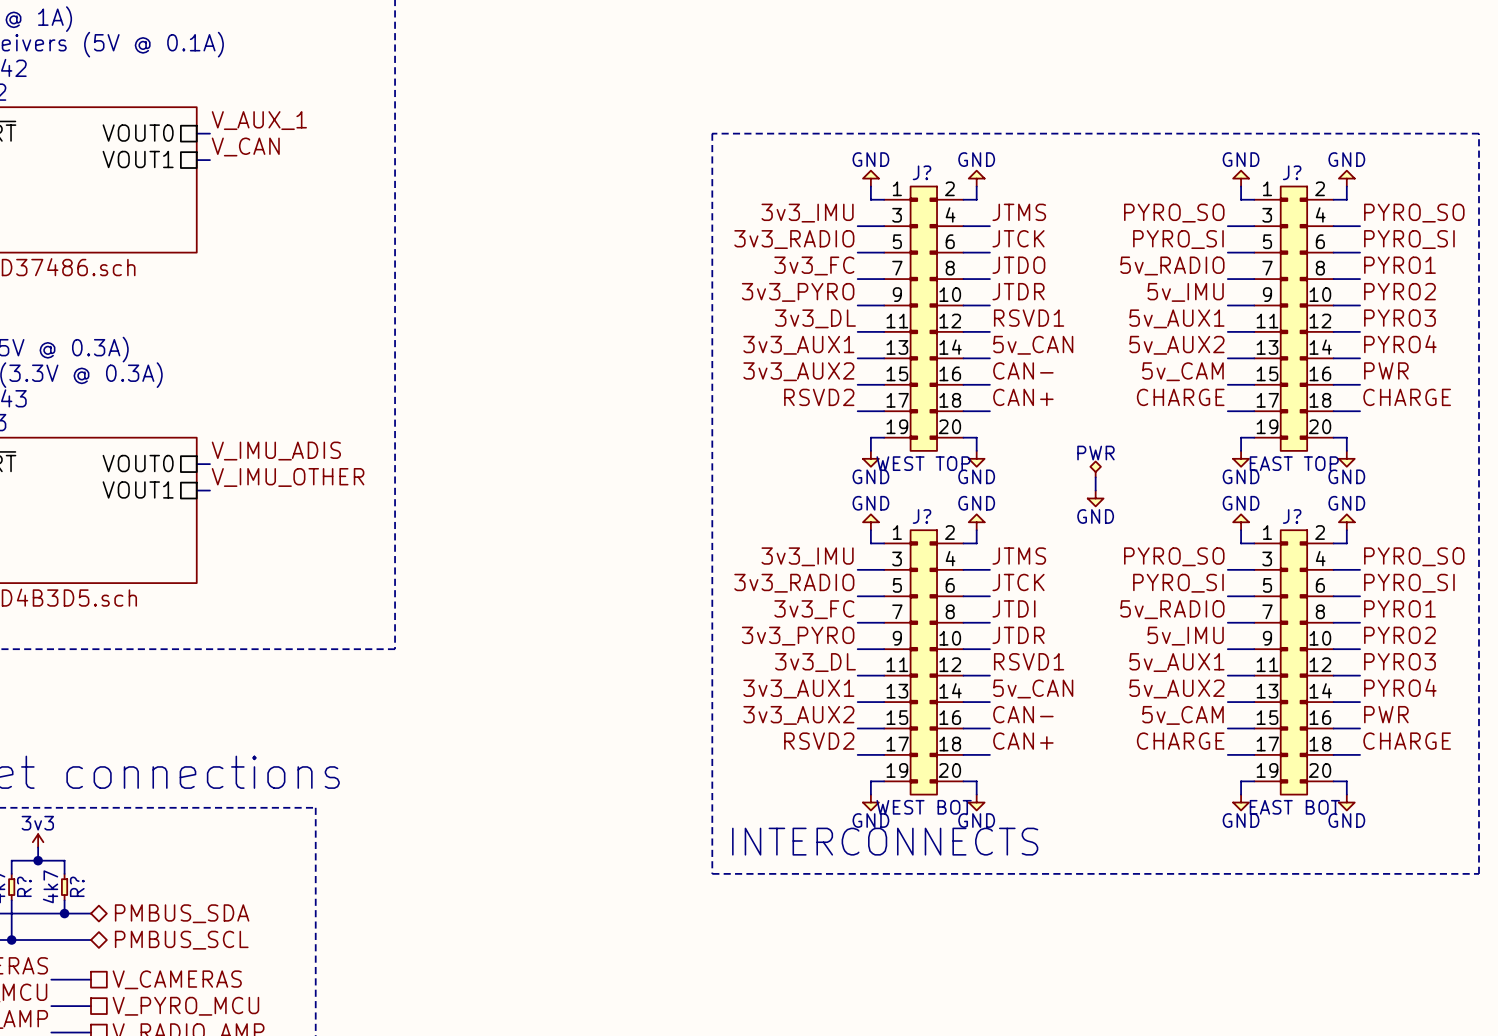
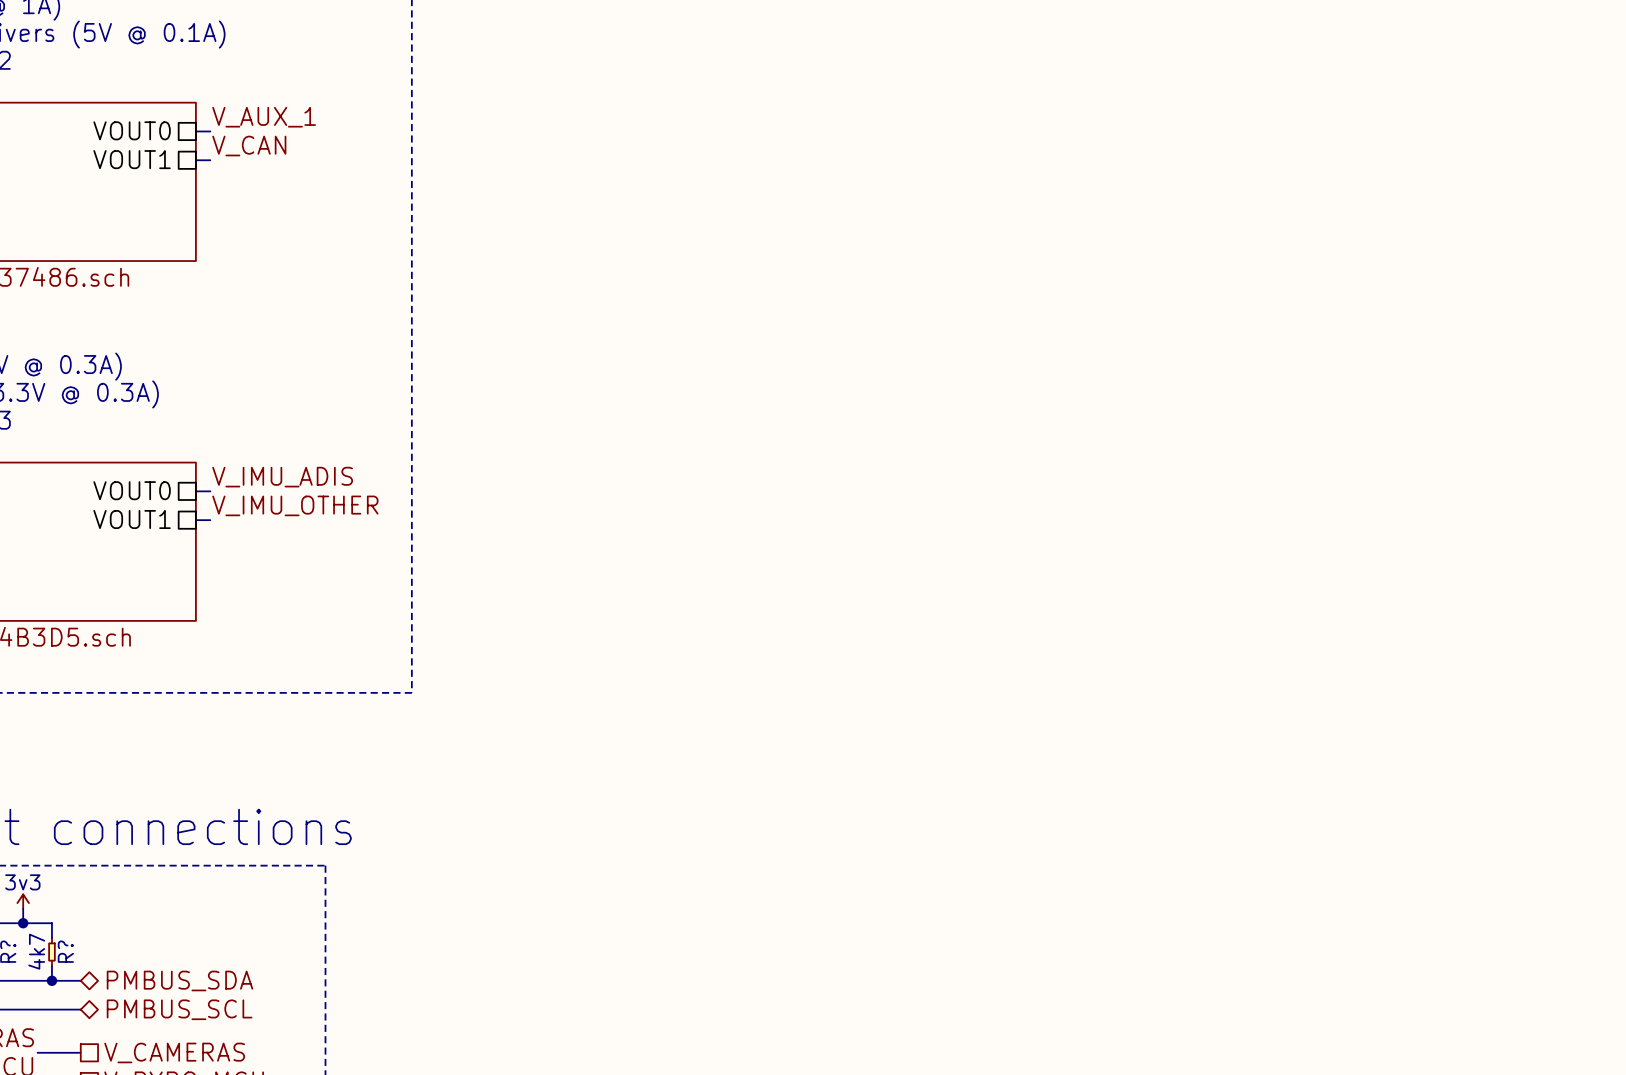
line: (712, 133) (1479, 133) (1479, 873) (712, 873) (712, 133) -> none
power symbol: GND (870, 178) -> none
power symbol: GND (976, 178) -> none
power symbol: GND (1241, 178) -> none
power symbol: GND (1346, 178) -> none
wire: (870, 186) (870, 199) (884, 199) -> none
wire: (976, 186) (976, 199) (963, 199) -> none
wire: (1241, 186) (1241, 199) (1254, 199) -> none
wire: (1346, 186) (1346, 199) (1333, 199) -> none
label: JTMS (1019, 212) -> none
label: 3v3_IMU (807, 213) -> none
label: PYRO_SO (1174, 213) -> none
label: PYRO_SO (1414, 213) -> none
wire: (857, 226) (884, 226) -> none
wire: (963, 226) (989, 226) -> none
wire: (1227, 226) (1254, 226) -> none
wire: (1333, 226) (1360, 226) -> none
label: JTCK (1018, 238) -> none
label: 3v3_RADIO (794, 239) -> none
label: PYRO_SI (1178, 239) -> none
label: PYRO_SI (1409, 239) -> none
wire: (857, 252) (884, 252) -> none
wire: (963, 252) (989, 252) -> none
wire: (1227, 252) (1254, 252) -> none
wire: (1333, 252) (1360, 252) -> none
label: 3v3_FC (814, 265) -> none
label: JTDO (1018, 265) -> none
label: 5v_RADIO (1172, 265) -> none
label: PYRO1 (1399, 265) -> none
wire: (857, 279) (884, 279) -> none
wire: (963, 279) (989, 279) -> none
wire: (1227, 279) (1254, 279) -> none
wire: (1333, 279) (1360, 279) -> none
label: JTDR (1018, 291) -> none
label: PYRO2 (1399, 291) -> none
label: 3v3_PYRO (798, 292) -> none
label: 5v_IMU (1185, 292) -> none
wire: (857, 305) (884, 305) -> none
wire: (963, 305) (989, 305) -> none
wire: (1227, 305) (1254, 305) -> none
wire: (1333, 305) (1360, 305) -> none
label: 3v3_DL (815, 318) -> none
J?: WEST TOP (923, 318) -> none
label: RSVD1 (1029, 318) -> none
label: 5v_AUX1 (1176, 318) -> none
J?: EAST TOP (1293, 318) -> none
label: PYRO3 (1399, 318) -> none
wire: (857, 331) (884, 331) -> none
wire: (963, 331) (989, 331) -> none
wire: (1227, 331) (1254, 331) -> none
wire: (1333, 331) (1360, 331) -> none
label: PYRO4 (1400, 344) -> none
label: 3v3_AUX1 (798, 345) -> none
label: 5v_CAN (1033, 345) -> none
label: 5v_AUX2 (1176, 345) -> none
wire: (857, 358) (884, 358) -> none
wire: (963, 358) (989, 358) -> none
wire: (1227, 358) (1254, 358) -> none
wire: (1333, 358) (1360, 358) -> none
label: CAN- (1023, 370) -> none
label: PWR (1386, 370) -> none
label: 3v3_AUX2 (798, 371) -> none
label: 5v_CAM (1182, 371) -> none
wire: (857, 384) (884, 384) -> none
wire: (963, 384) (989, 384) -> none
wire: (1227, 384) (1254, 384) -> none
wire: (1333, 384) (1360, 384) -> none
label: RSVD2 (819, 397) -> none
label: CAN+ (1023, 397) -> none
label: CHARGE (1180, 397) -> none
label: CHARGE (1407, 397) -> none
wire: (857, 411) (884, 411) -> none
wire: (963, 411) (989, 411) -> none
wire: (1227, 411) (1254, 411) -> none
wire: (1333, 411) (1360, 411) -> none
wire: (884, 437) (870, 437) (870, 450) -> none
wire: (963, 437) (976, 437) (976, 450) -> none
wire: (1254, 437) (1241, 437) (1241, 450) -> none
wire: (1333, 437) (1346, 437) (1346, 450) -> none
power symbol: GND (870, 458) -> none
power symbol: GND (976, 458) -> none
power symbol: GND (1241, 458) -> none
power symbol: GND (1346, 458) -> none
power symbol: PWR (1095, 469) -> none
wire: (1095, 477) (1095, 490) -> none
power symbol: GND (1095, 498) -> none
power symbol: GND (870, 522) -> none
power symbol: GND (976, 522) -> none
power symbol: GND (1241, 522) -> none
power symbol: GND (1346, 522) -> none
wire: (870, 530) (870, 543) (884, 543) -> none
wire: (976, 530) (976, 543) (963, 543) -> none
wire: (1241, 530) (1241, 543) (1254, 543) -> none
wire: (1346, 530) (1346, 543) (1333, 543) -> none
label: 3v3_IMU (807, 556) -> none
label: JTMS (1019, 556) -> none
label: PYRO_SO (1174, 556) -> none
label: PYRO_SO (1414, 556) -> none
wire: (857, 569) (884, 569) -> none
wire: (963, 569) (989, 569) -> none
wire: (1227, 569) (1254, 569) -> none
wire: (1333, 569) (1360, 569) -> none
label: JTCK (1018, 582) -> none
label: 3v3_RADIO (794, 583) -> none
label: PYRO_SI (1178, 583) -> none
label: PYRO_SI (1409, 583) -> none
wire: (857, 596) (884, 596) -> none
wire: (963, 596) (989, 596) -> none
wire: (1227, 596) (1254, 596) -> none
wire: (1333, 596) (1360, 596) -> none
label: JTDI (1013, 608) -> none
label: PYRO1 (1399, 608) -> none
label: 3v3_FC (814, 609) -> none
label: 5v_RADIO (1172, 609) -> none
wire: (857, 622) (884, 622) -> none
wire: (963, 622) (989, 622) -> none
wire: (1227, 622) (1254, 622) -> none
wire: (1333, 622) (1360, 622) -> none
label: JTDR (1018, 635) -> none
label: PYRO2 (1399, 635) -> none
label: 3v3_PYRO (798, 636) -> none
label: 5v_IMU (1185, 636) -> none
wire: (857, 649) (884, 649) -> none
wire: (963, 649) (989, 649) -> none
wire: (1227, 649) (1254, 649) -> none
wire: (1333, 649) (1360, 649) -> none
label: RSVD1 (1029, 661) -> none
label: PYRO3 (1399, 661) -> none
label: 3v3_DL (815, 662) -> none
J?: WEST BOT (923, 662) -> none
label: 5v_AUX1 (1176, 662) -> none
J?: EAST BOT (1293, 662) -> none
wire: (857, 675) (884, 675) -> none
wire: (963, 675) (989, 675) -> none
wire: (1227, 675) (1254, 675) -> none
wire: (1333, 675) (1360, 675) -> none
label: PYRO4 (1400, 687) -> none
label: 3v3_AUX1 (798, 688) -> none
label: 5v_CAN (1033, 688) -> none
label: 5v_AUX2 (1176, 688) -> none
wire: (857, 702) (884, 702) -> none
wire: (963, 702) (989, 702) -> none
wire: (1227, 702) (1254, 702) -> none
wire: (1333, 702) (1360, 702) -> none
label: CAN- (1023, 714) -> none
label: PWR (1386, 714) -> none
label: 3v3_AUX2 (798, 715) -> none
label: 5v_CAM (1182, 715) -> none
wire: (857, 728) (884, 728) -> none
wire: (963, 728) (989, 728) -> none
wire: (1227, 728) (1254, 728) -> none
wire: (1333, 728) (1360, 728) -> none
label: RSVD2 (819, 741) -> none
label: CAN+ (1023, 741) -> none
label: CHARGE (1180, 741) -> none
label: CHARGE (1407, 741) -> none
wire: (857, 754) (884, 754) -> none
wire: (963, 754) (989, 754) -> none
wire: (1227, 754) (1254, 754) -> none
wire: (1333, 754) (1360, 754) -> none
wire: (884, 781) (870, 781) (870, 794) -> none
wire: (963, 781) (976, 781) (976, 794) -> none
wire: (1254, 781) (1241, 781) (1241, 794) -> none
wire: (1333, 781) (1346, 781) (1346, 794) -> none
power symbol: GND (870, 802) -> none
power symbol: GND (976, 802) -> none
power symbol: GND (1241, 802) -> none
power symbol: GND (1346, 802) -> none
text: INTERCONNECTS (885, 841) -> none

